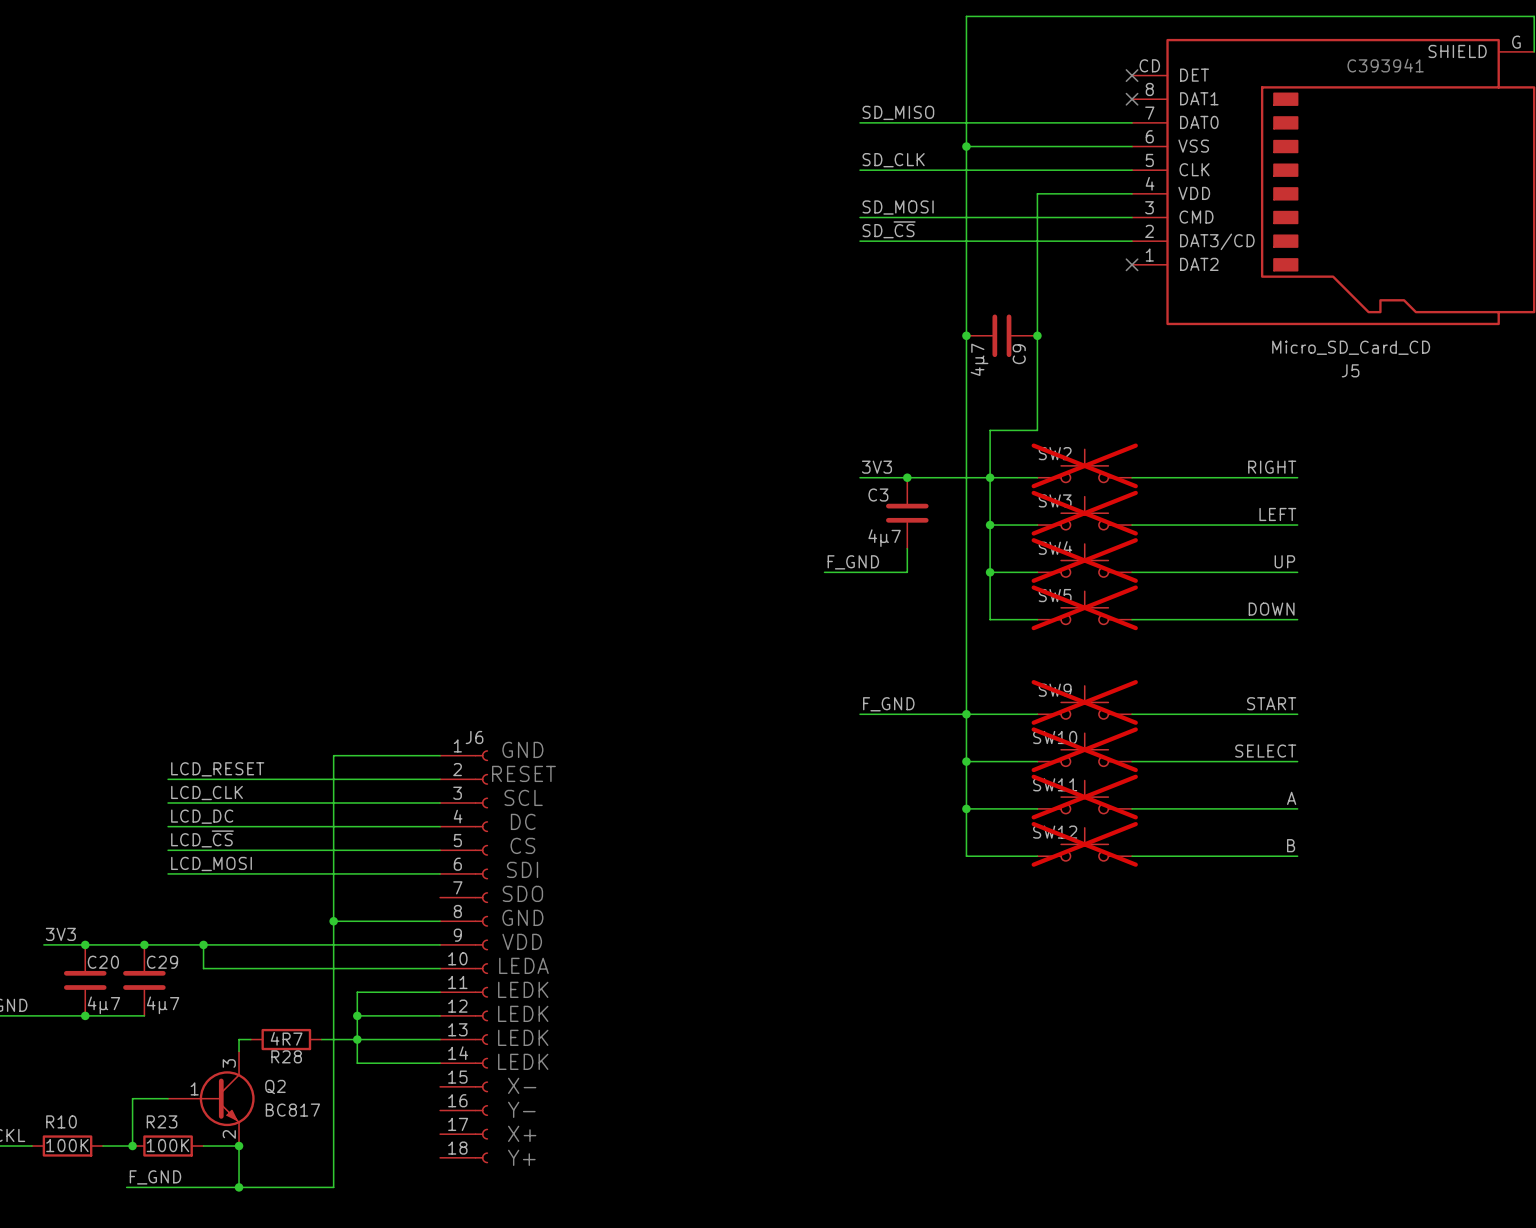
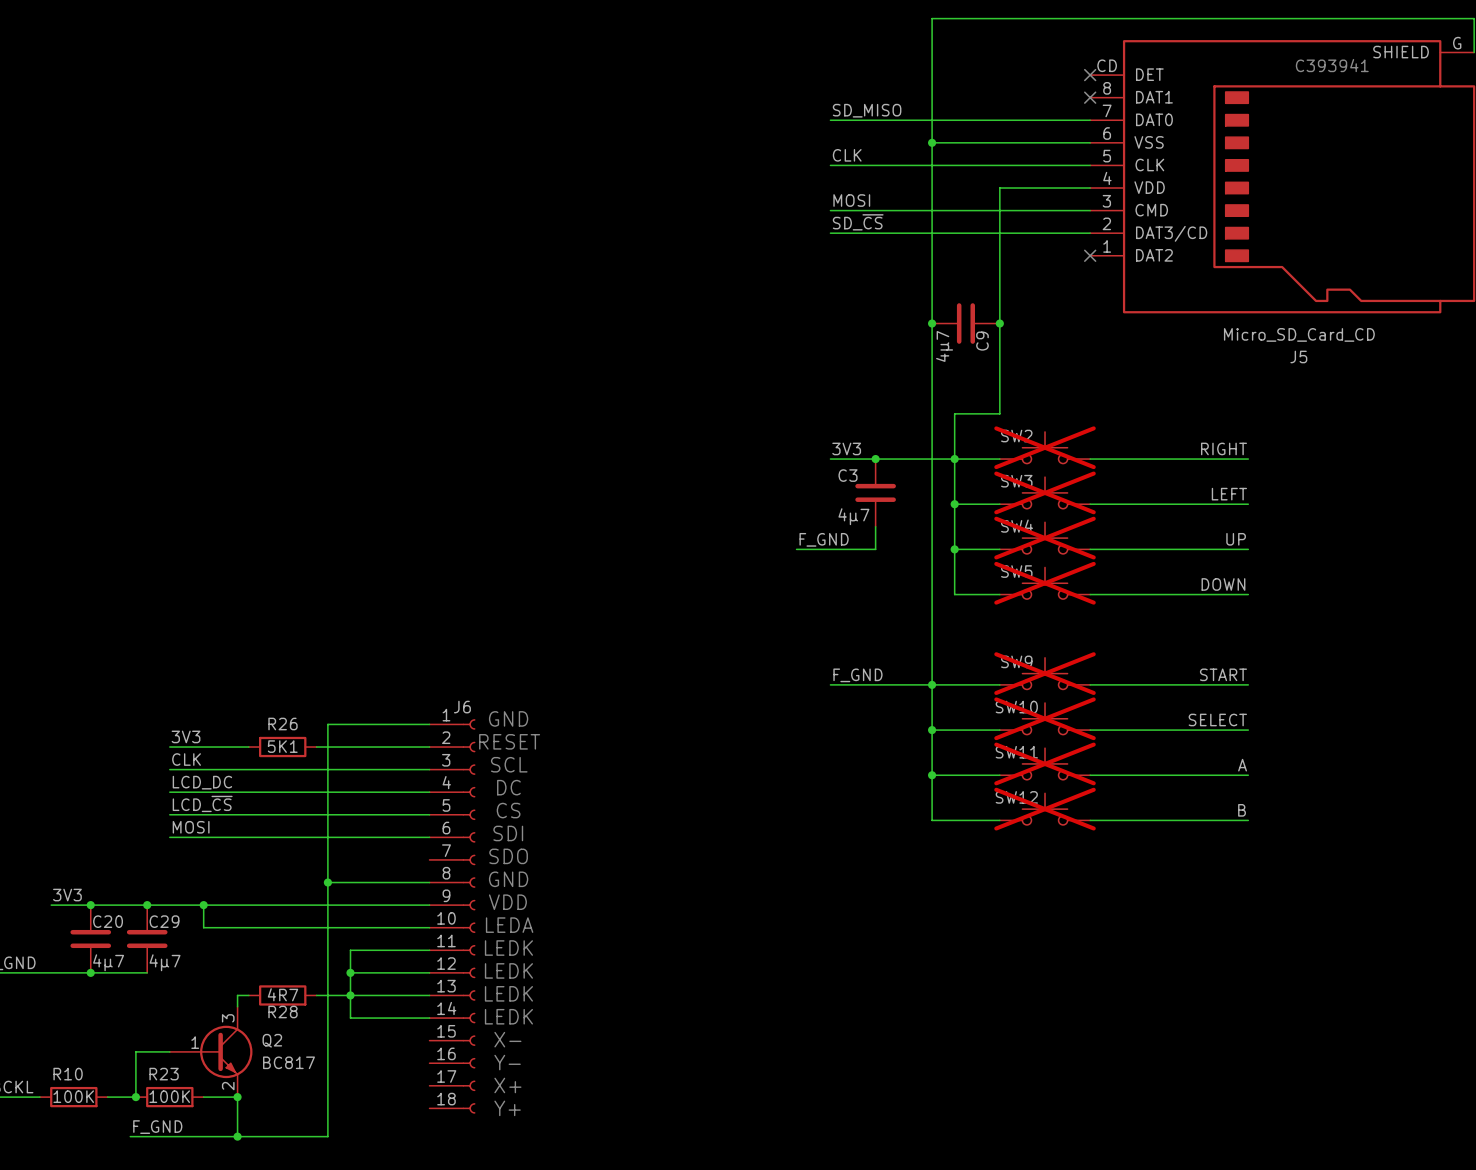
label: SD_CLK (893, 160) -> CLK (847, 155)
label: SD_MOSI (898, 207) -> MOSI (851, 200)
label: LCD_RESET (217, 769) -> 3V3 (186, 736)
wire: (250, 779) (321, 779) -> none
R26: none -> 5K1 (282, 747)
label: LCD_CLK (207, 793) -> CLK (186, 759)
label: LCD_MOSI (211, 863) -> MOSI (191, 827)

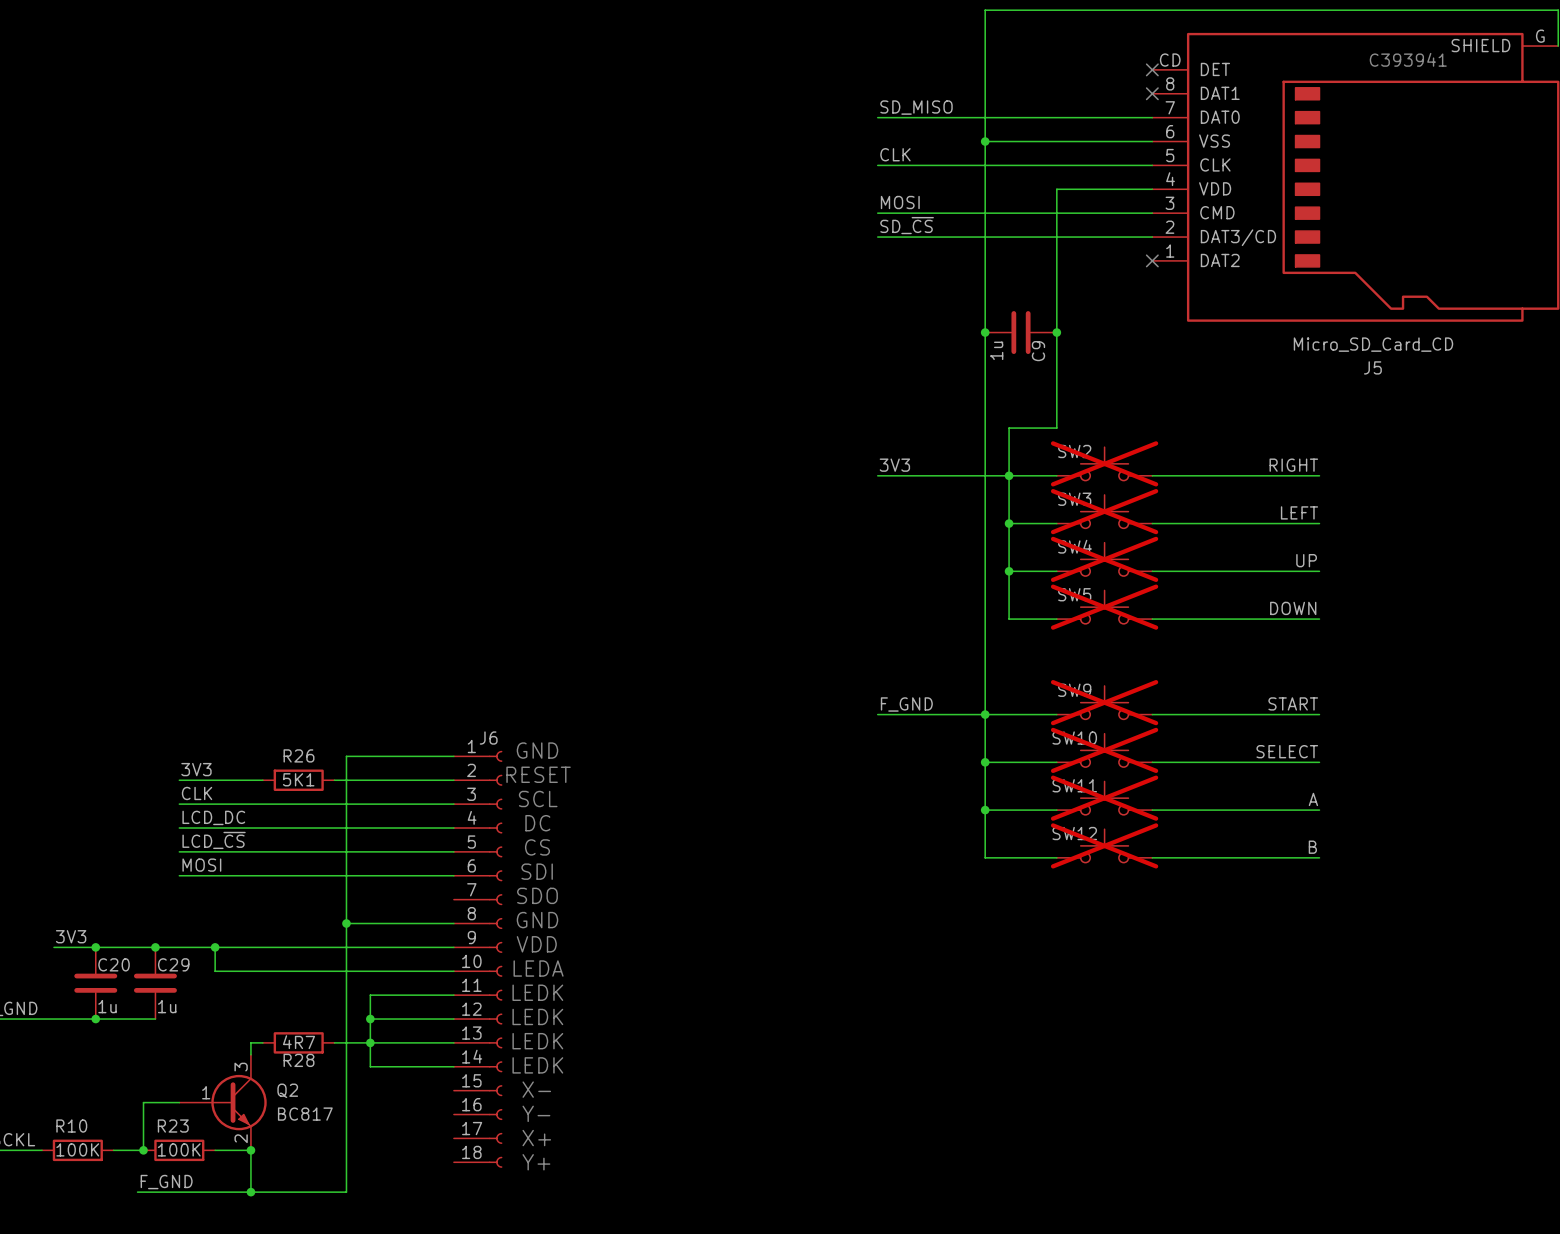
C9 value: 4µ7 (944, 346) -> 1u (996, 350)
junction: (875, 459) -> none
C3: 4µ7 (875, 492) -> none
wire: (875, 526) (875, 549) (796, 549) -> none
label: F_GND (824, 539) -> none
C20 value: 4µ7 (108, 962) -> 1u (107, 1006)
C29 value: 4µ7 (165, 962) -> 1u (167, 1006)

